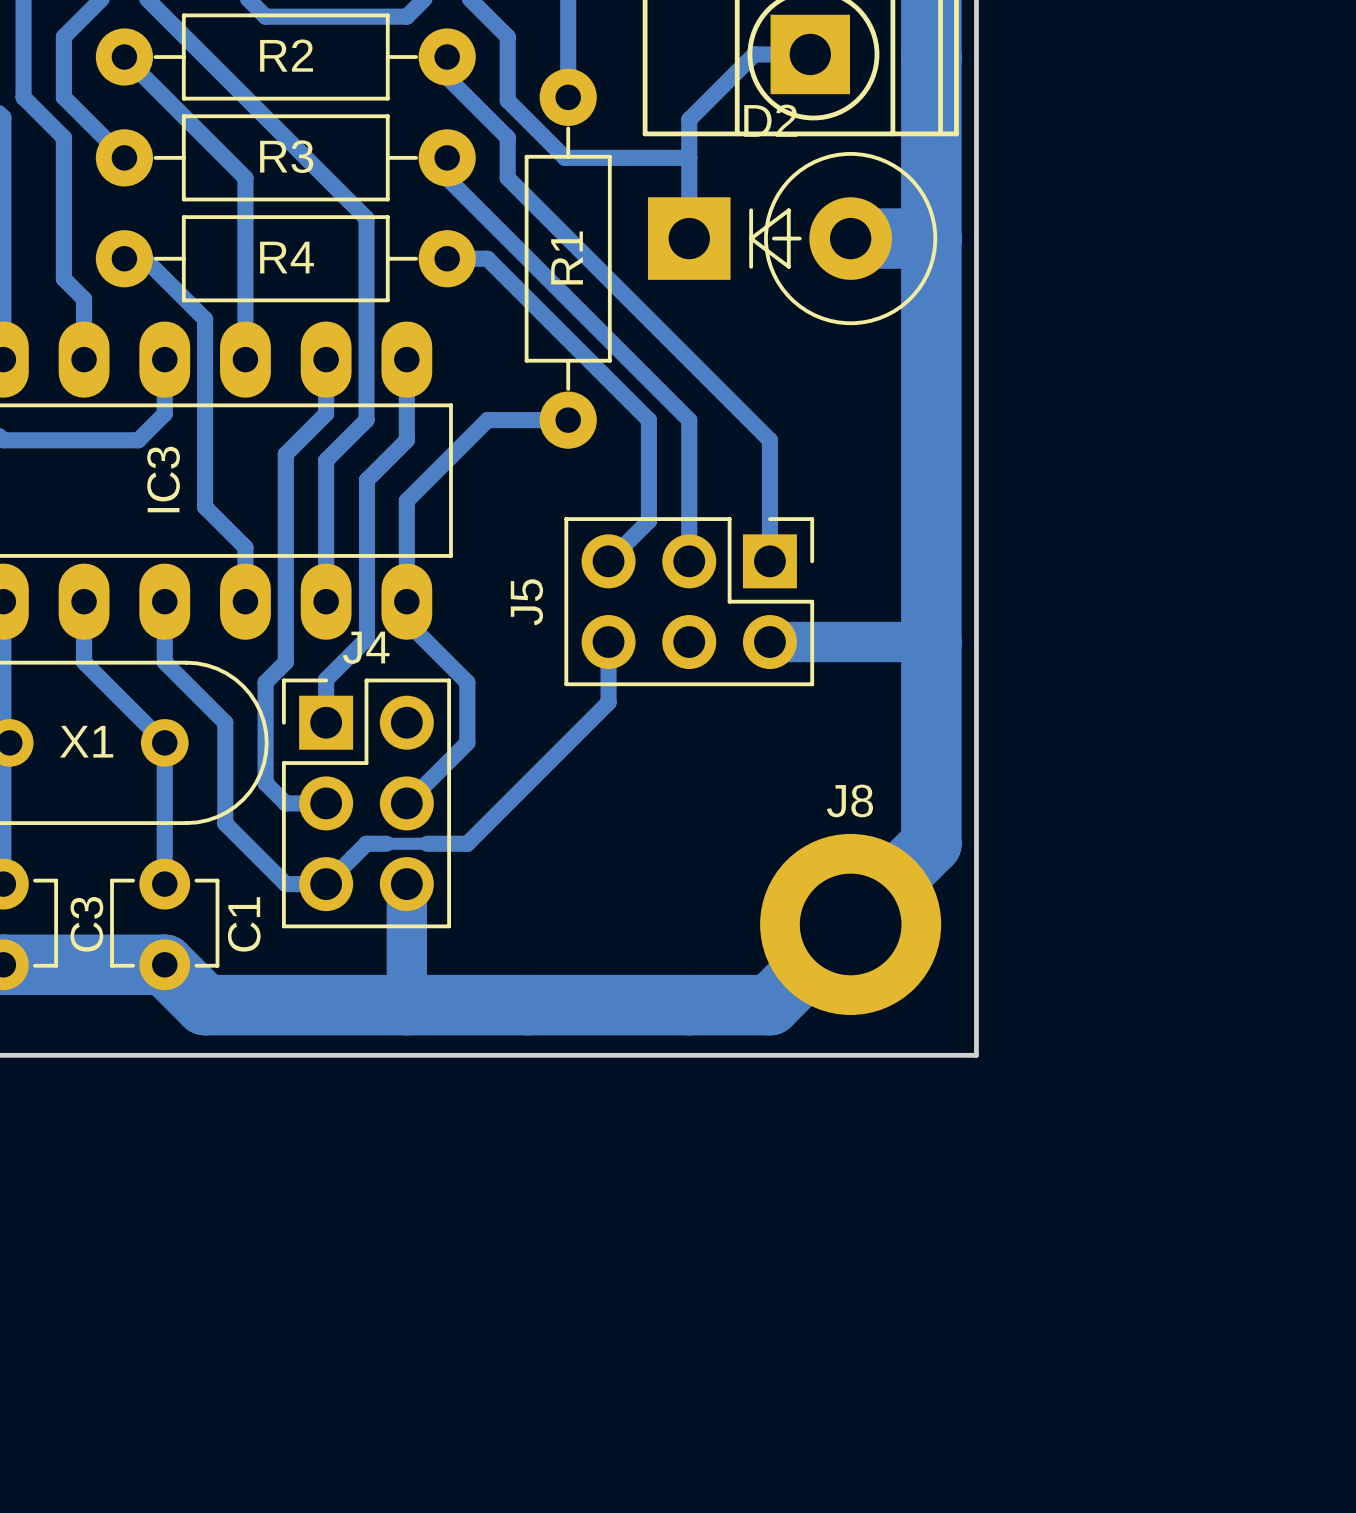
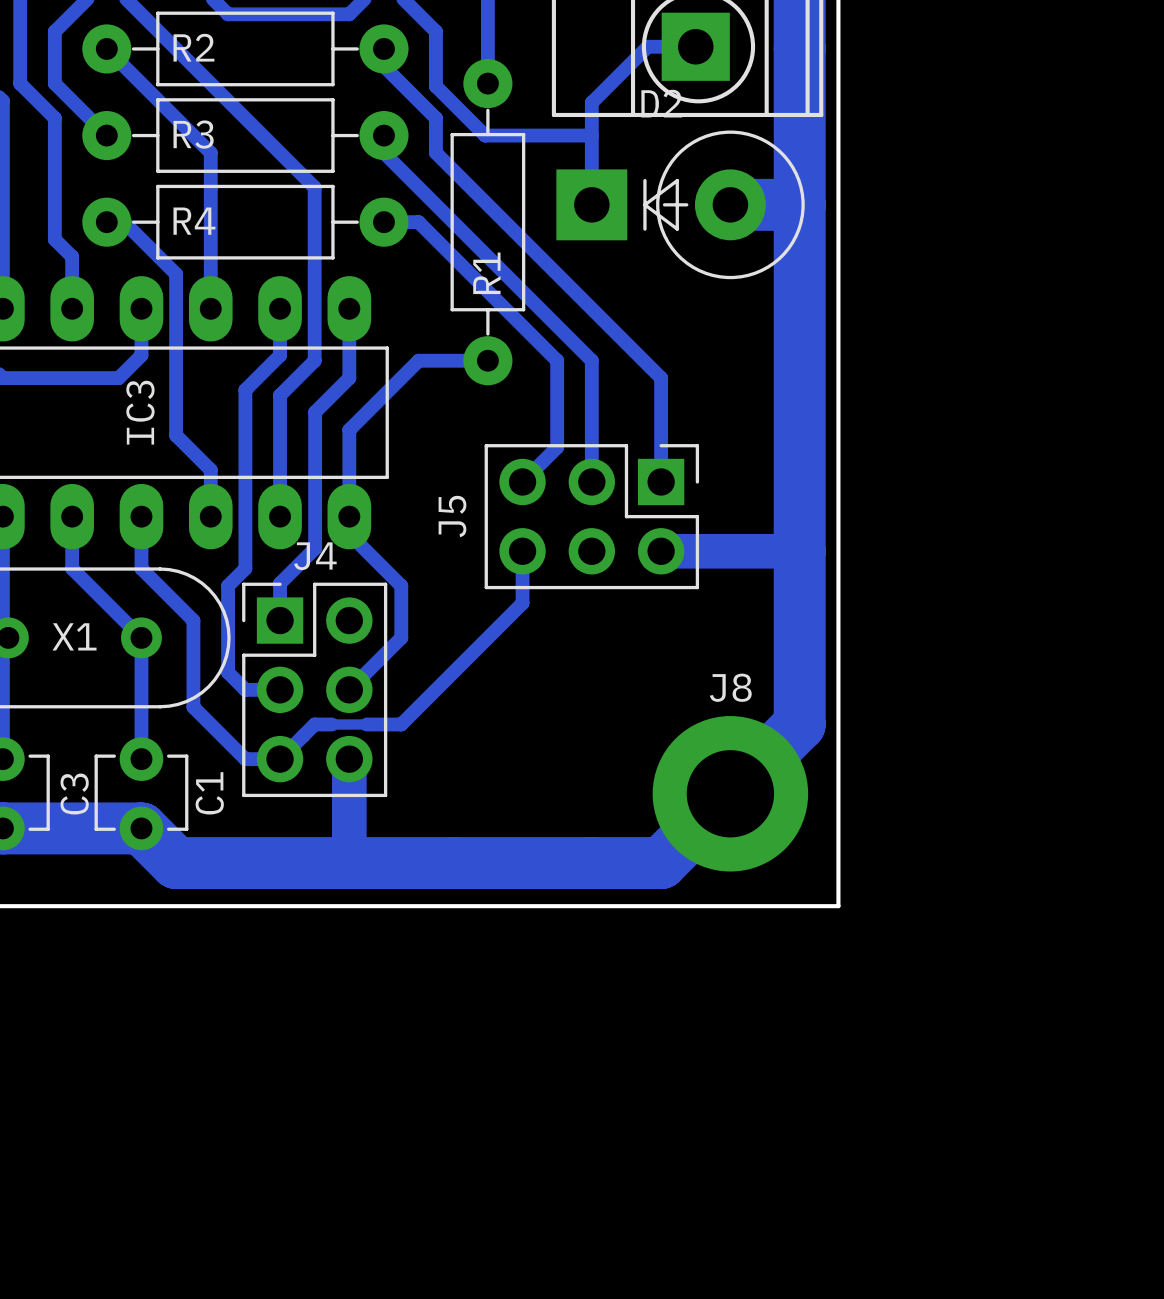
R2 name position: R2 (286, 55) -> R2 (193, 47)
R3 name position: R3 (286, 156) -> R3 (193, 134)
R4 name position: R4 (287, 257) -> R4 (194, 221)
R1 name position: R1 (567, 257) -> R1 (486, 273)

